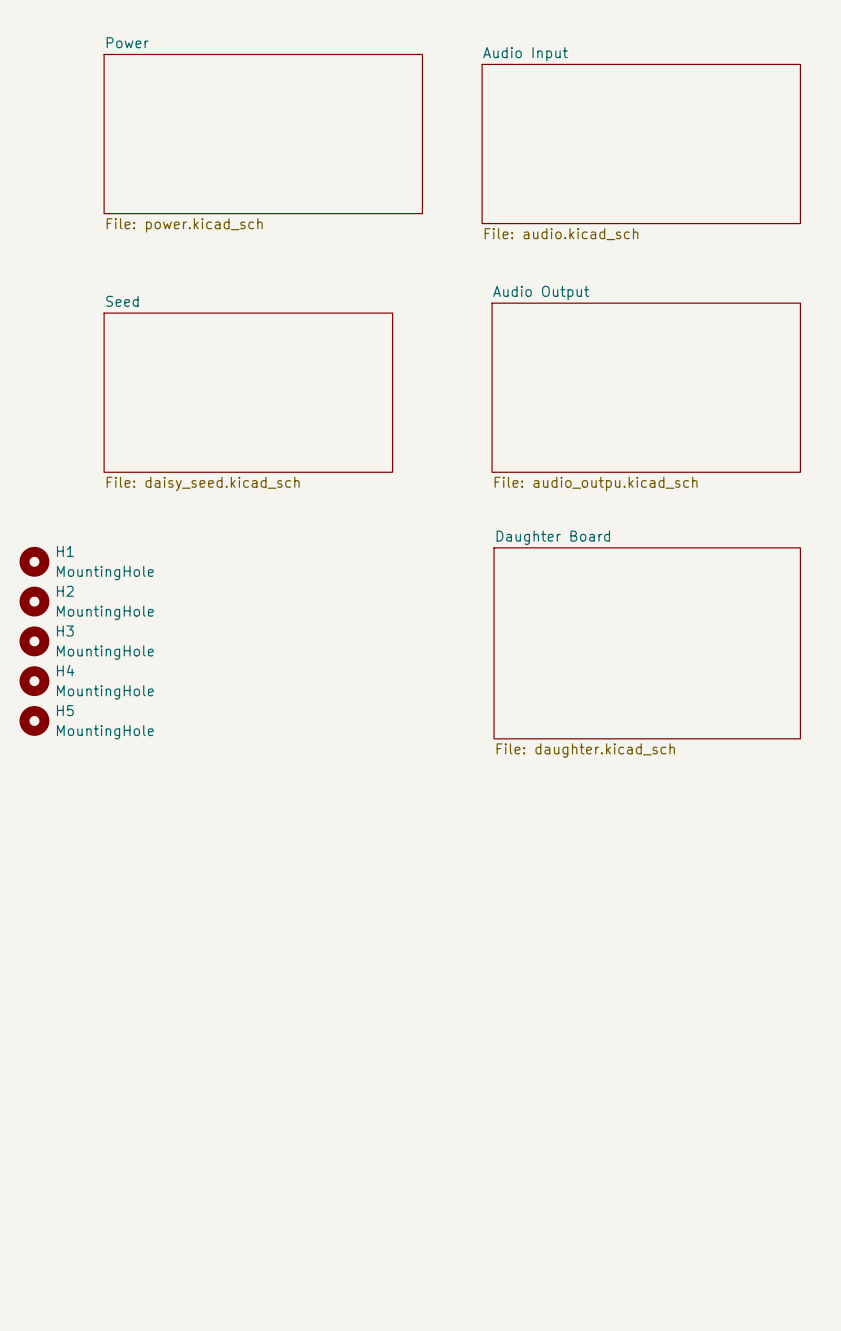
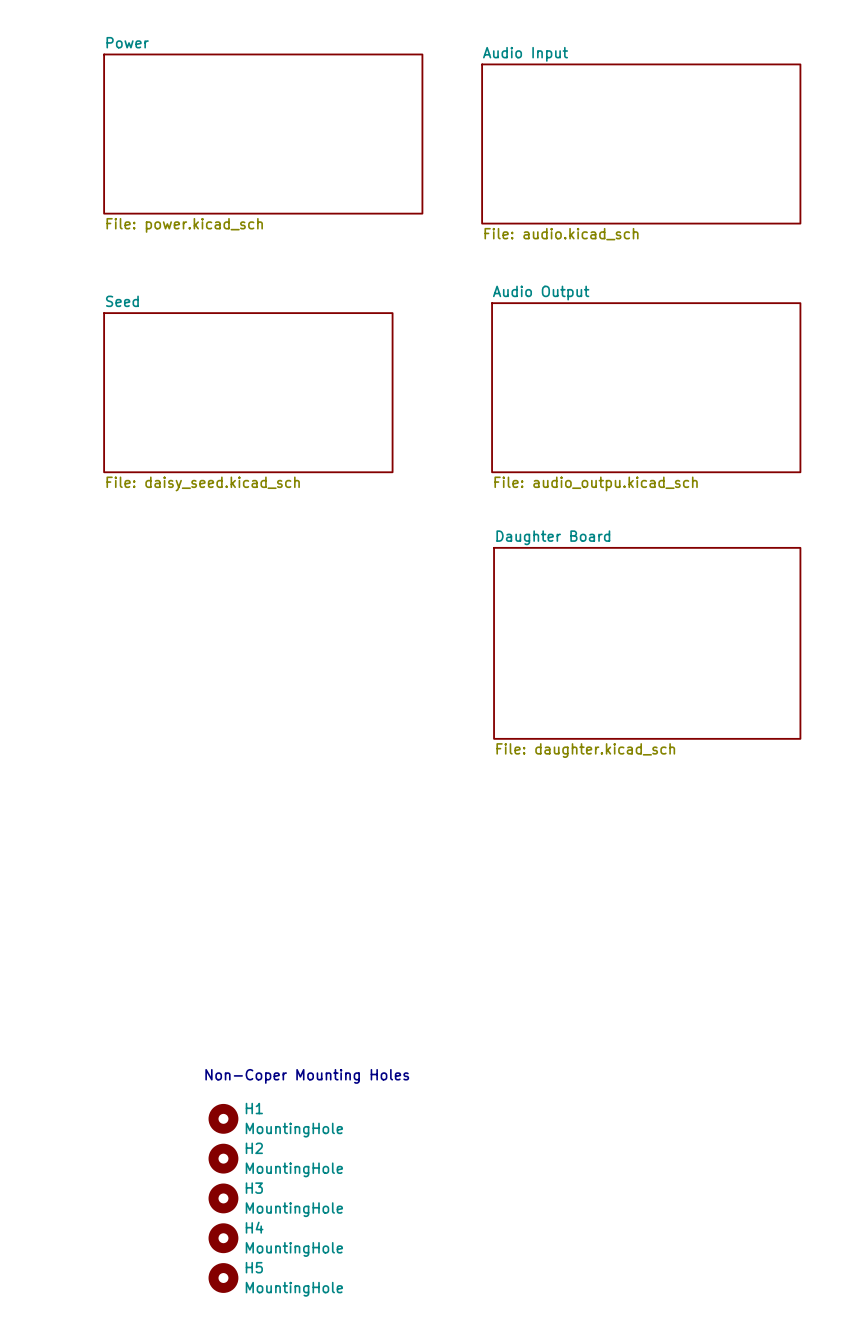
H1 position: (34, 561) -> (223, 1118)
H2 position: (34, 601) -> (223, 1158)
H3 position: (34, 641) -> (223, 1198)
H4 position: (34, 681) -> (223, 1238)
H5 position: (34, 720) -> (223, 1278)
text: none -> Non-Coper Mounting Holes (307, 1076)

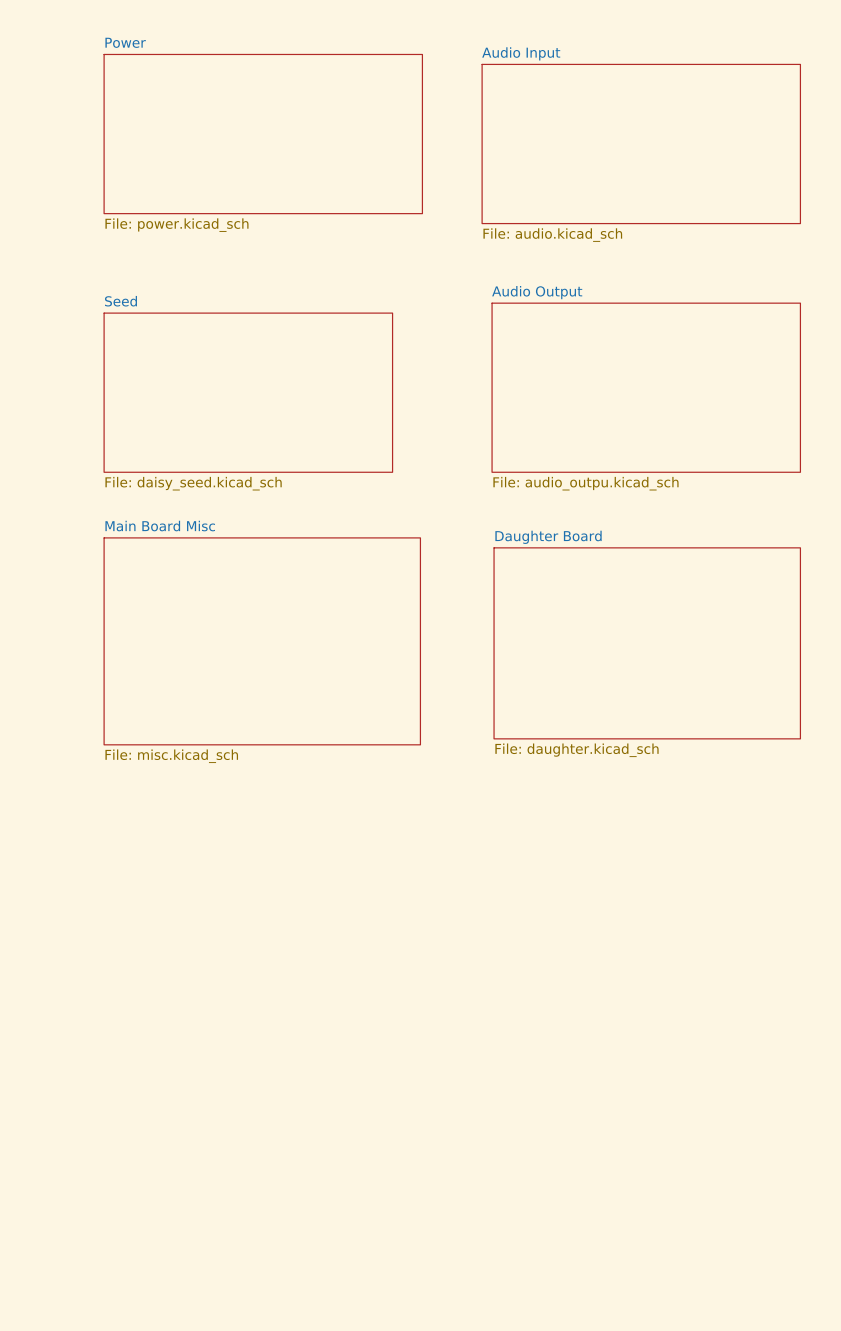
sheet Main Board Misc: none -> File: misc.kicad_sch (262, 641)
text: Non-Coper Mounting Holes (307, 1076) -> none
H1: MountingHole (223, 1118) -> none
H2: MountingHole (223, 1158) -> none
H3: MountingHole (223, 1198) -> none
H4: MountingHole (223, 1238) -> none
H5: MountingHole (223, 1278) -> none

